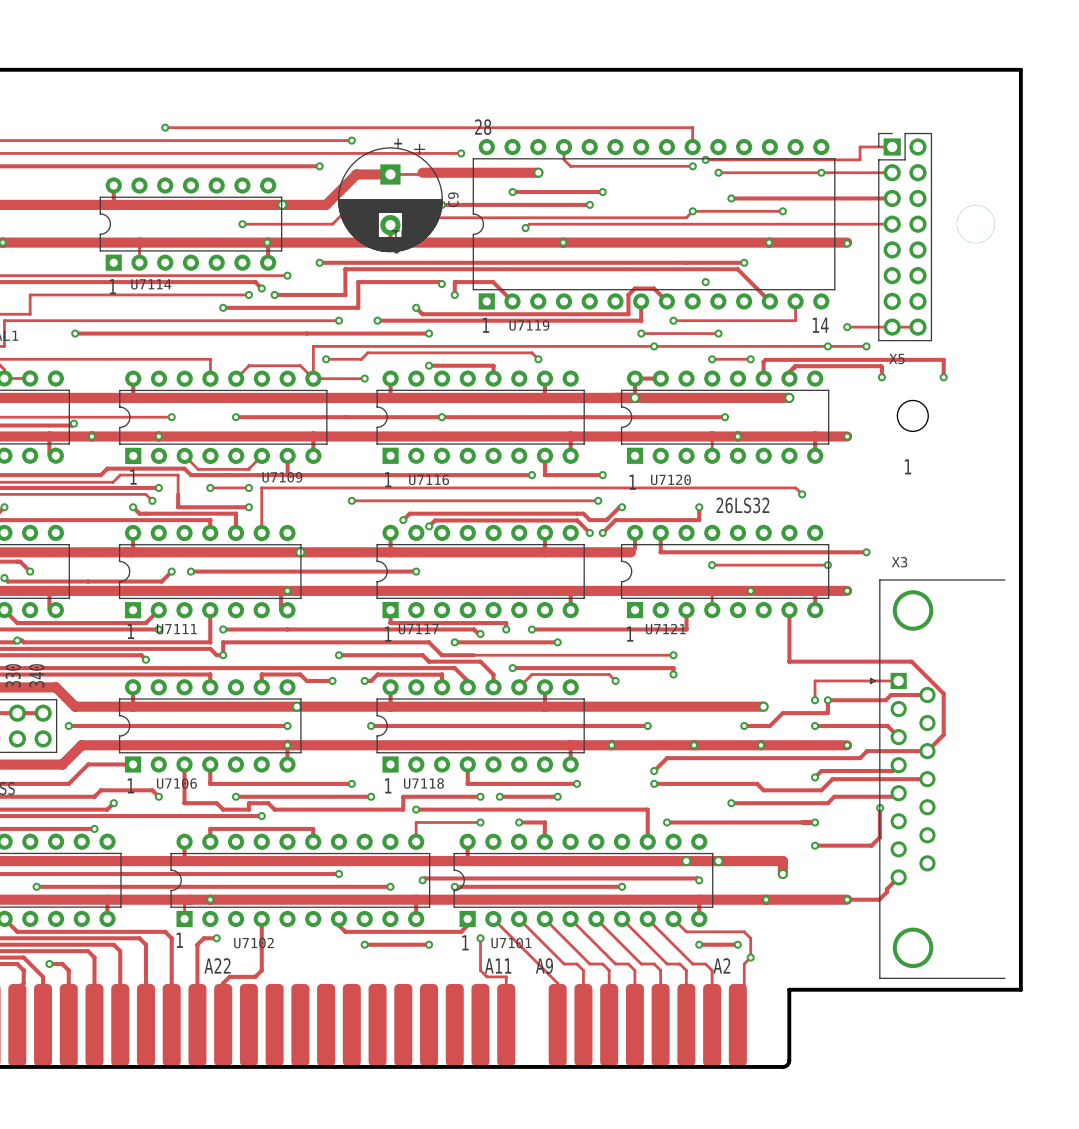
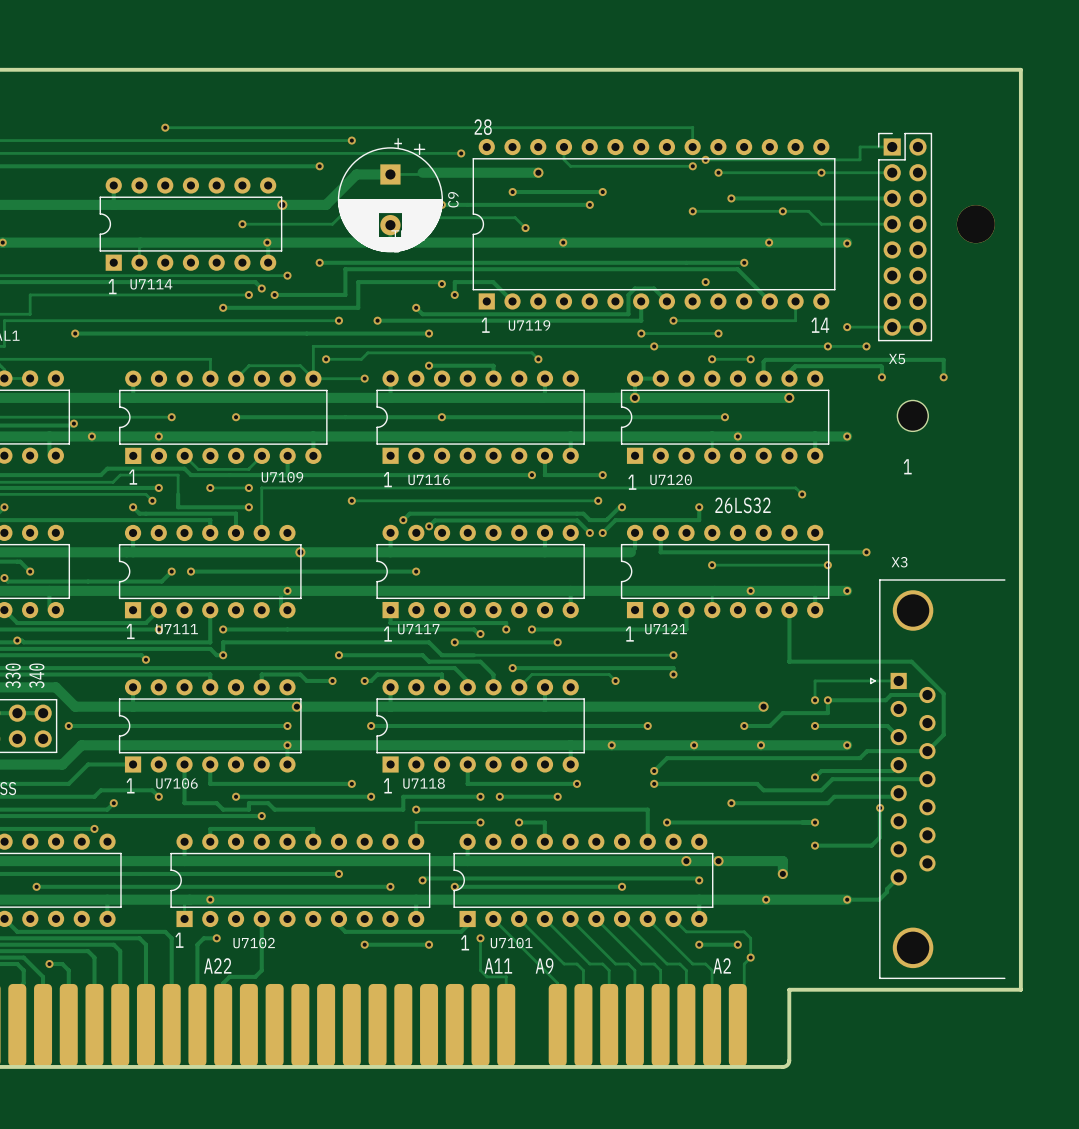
track: (692, 211) (686, 217) (515, 217) -> (525, 228) (515, 217)
track: (821, 224) (529, 224) (525, 228) -> (821, 224) (808, 211) (782, 211)

